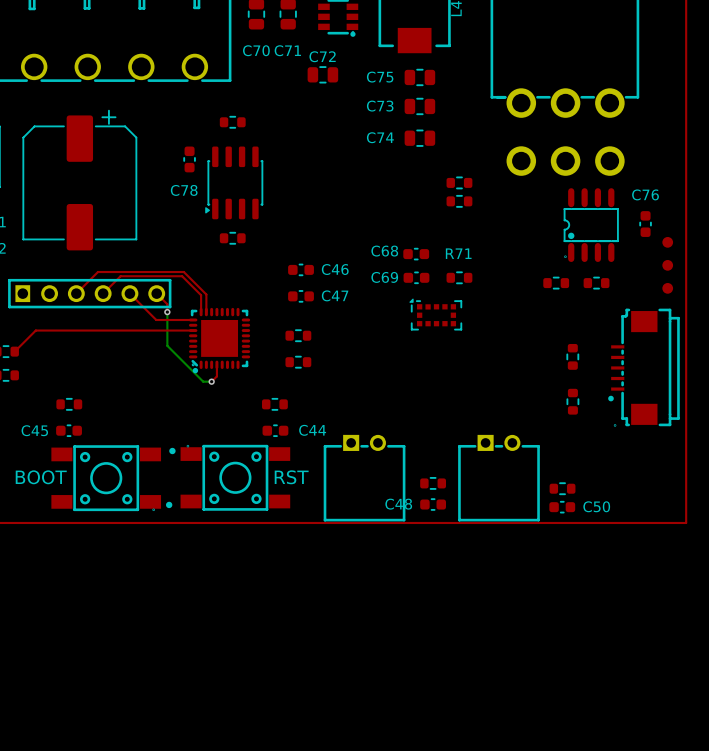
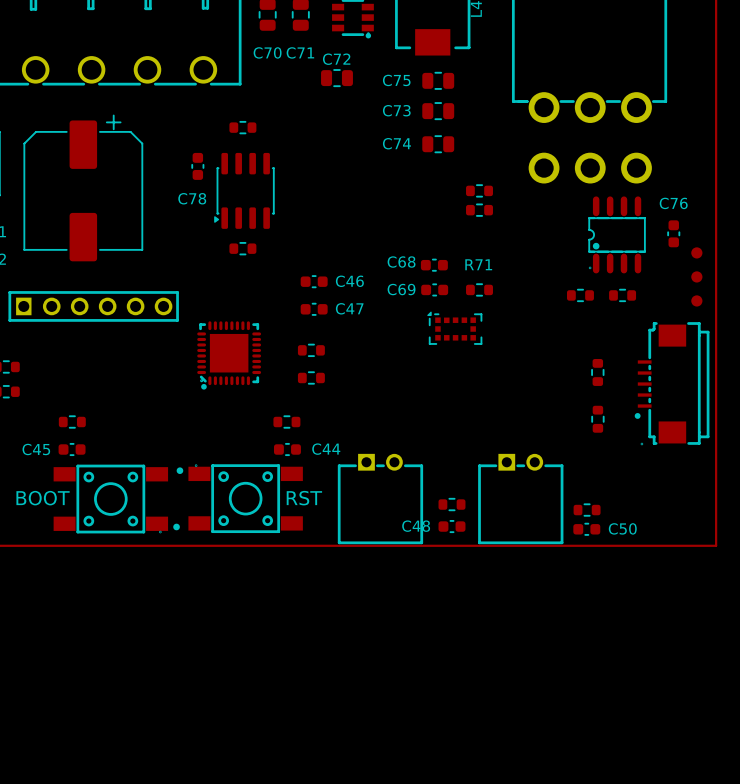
top track: (76, 293) (97, 272) (183, 272) (206, 294) (206, 312) -> none
top track: (103, 293) (120, 276) (182, 276) (201, 295) (201, 312) -> none
top track: (129, 293) (156, 319) (193, 319) -> none
top track: (156, 293) (167, 304) (167, 312) -> none
bottom track: (167, 312) (167, 345) (203, 381) (211, 381) -> none
via: (167, 312) -> none
top track: (193, 330) (35, 330) (14, 351) -> none
top track: (216, 364) (216, 376) (211, 381) -> none
via: (211, 381) -> none

